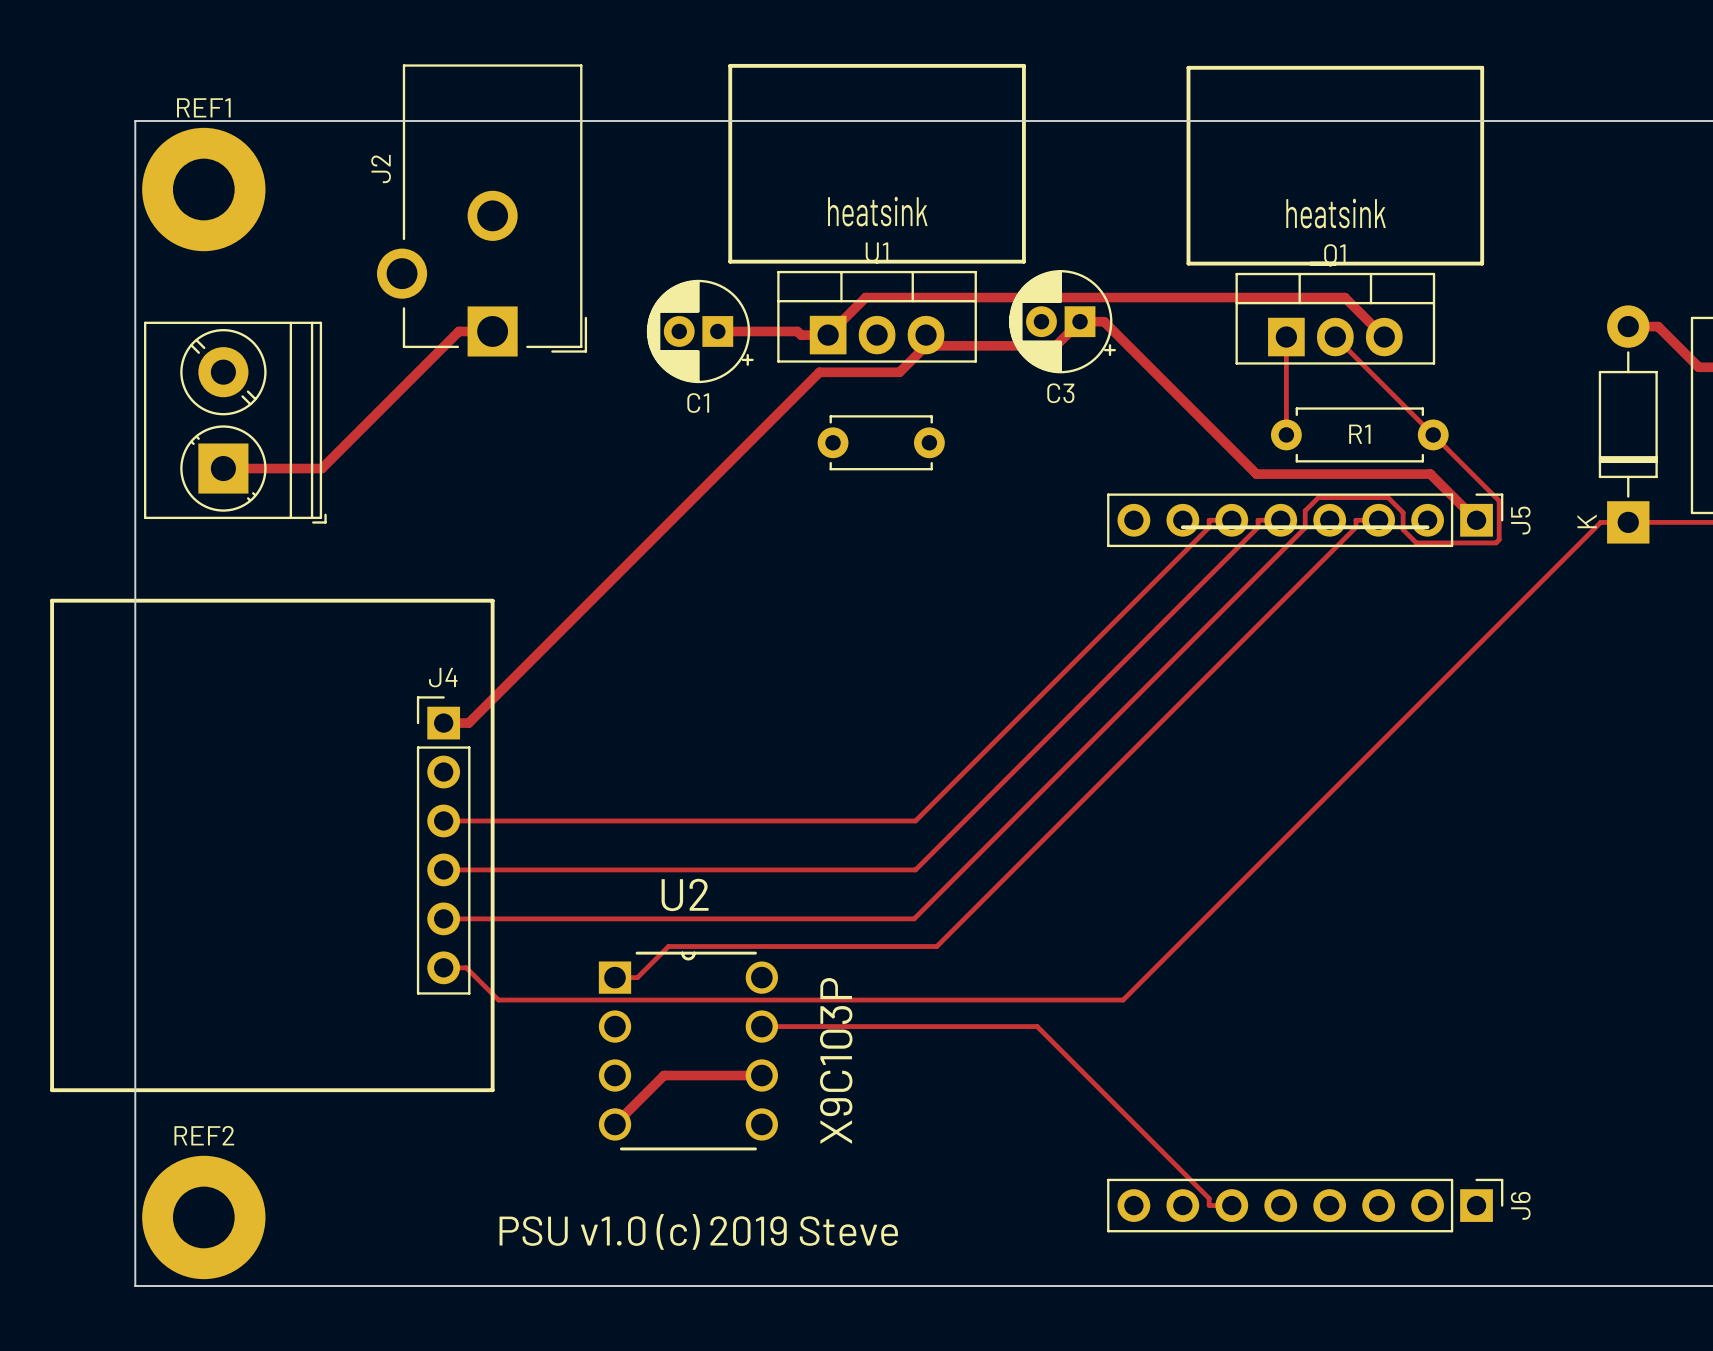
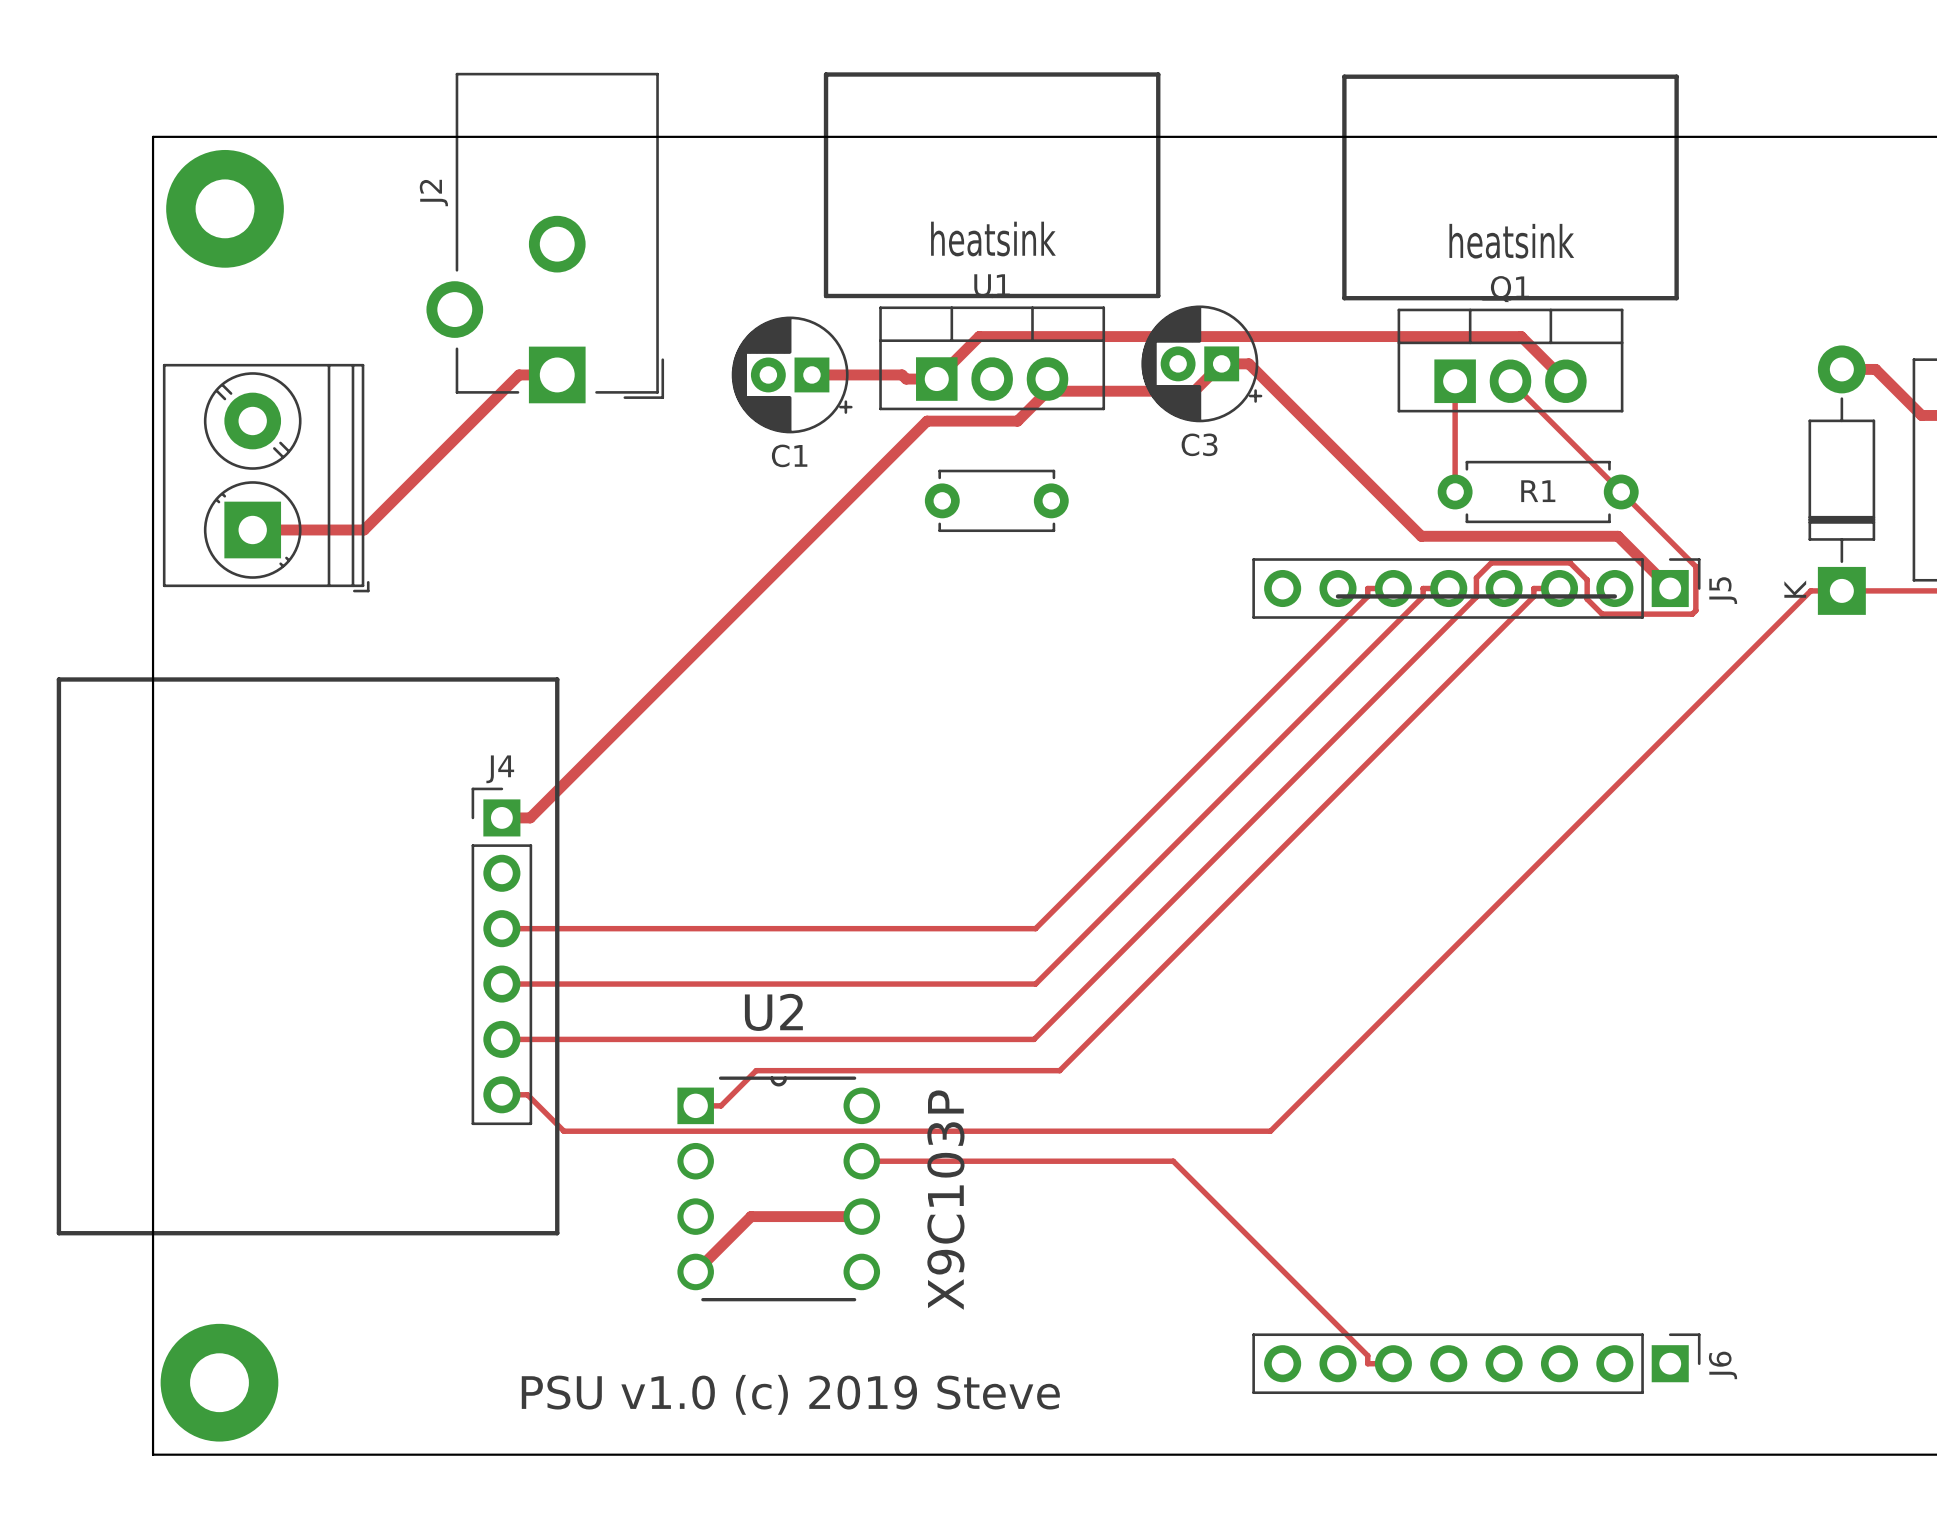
part: none -> (225, 208)
REF1: (203, 189) -> none
REF2: (203, 1217) -> none
part: none -> (219, 1382)

